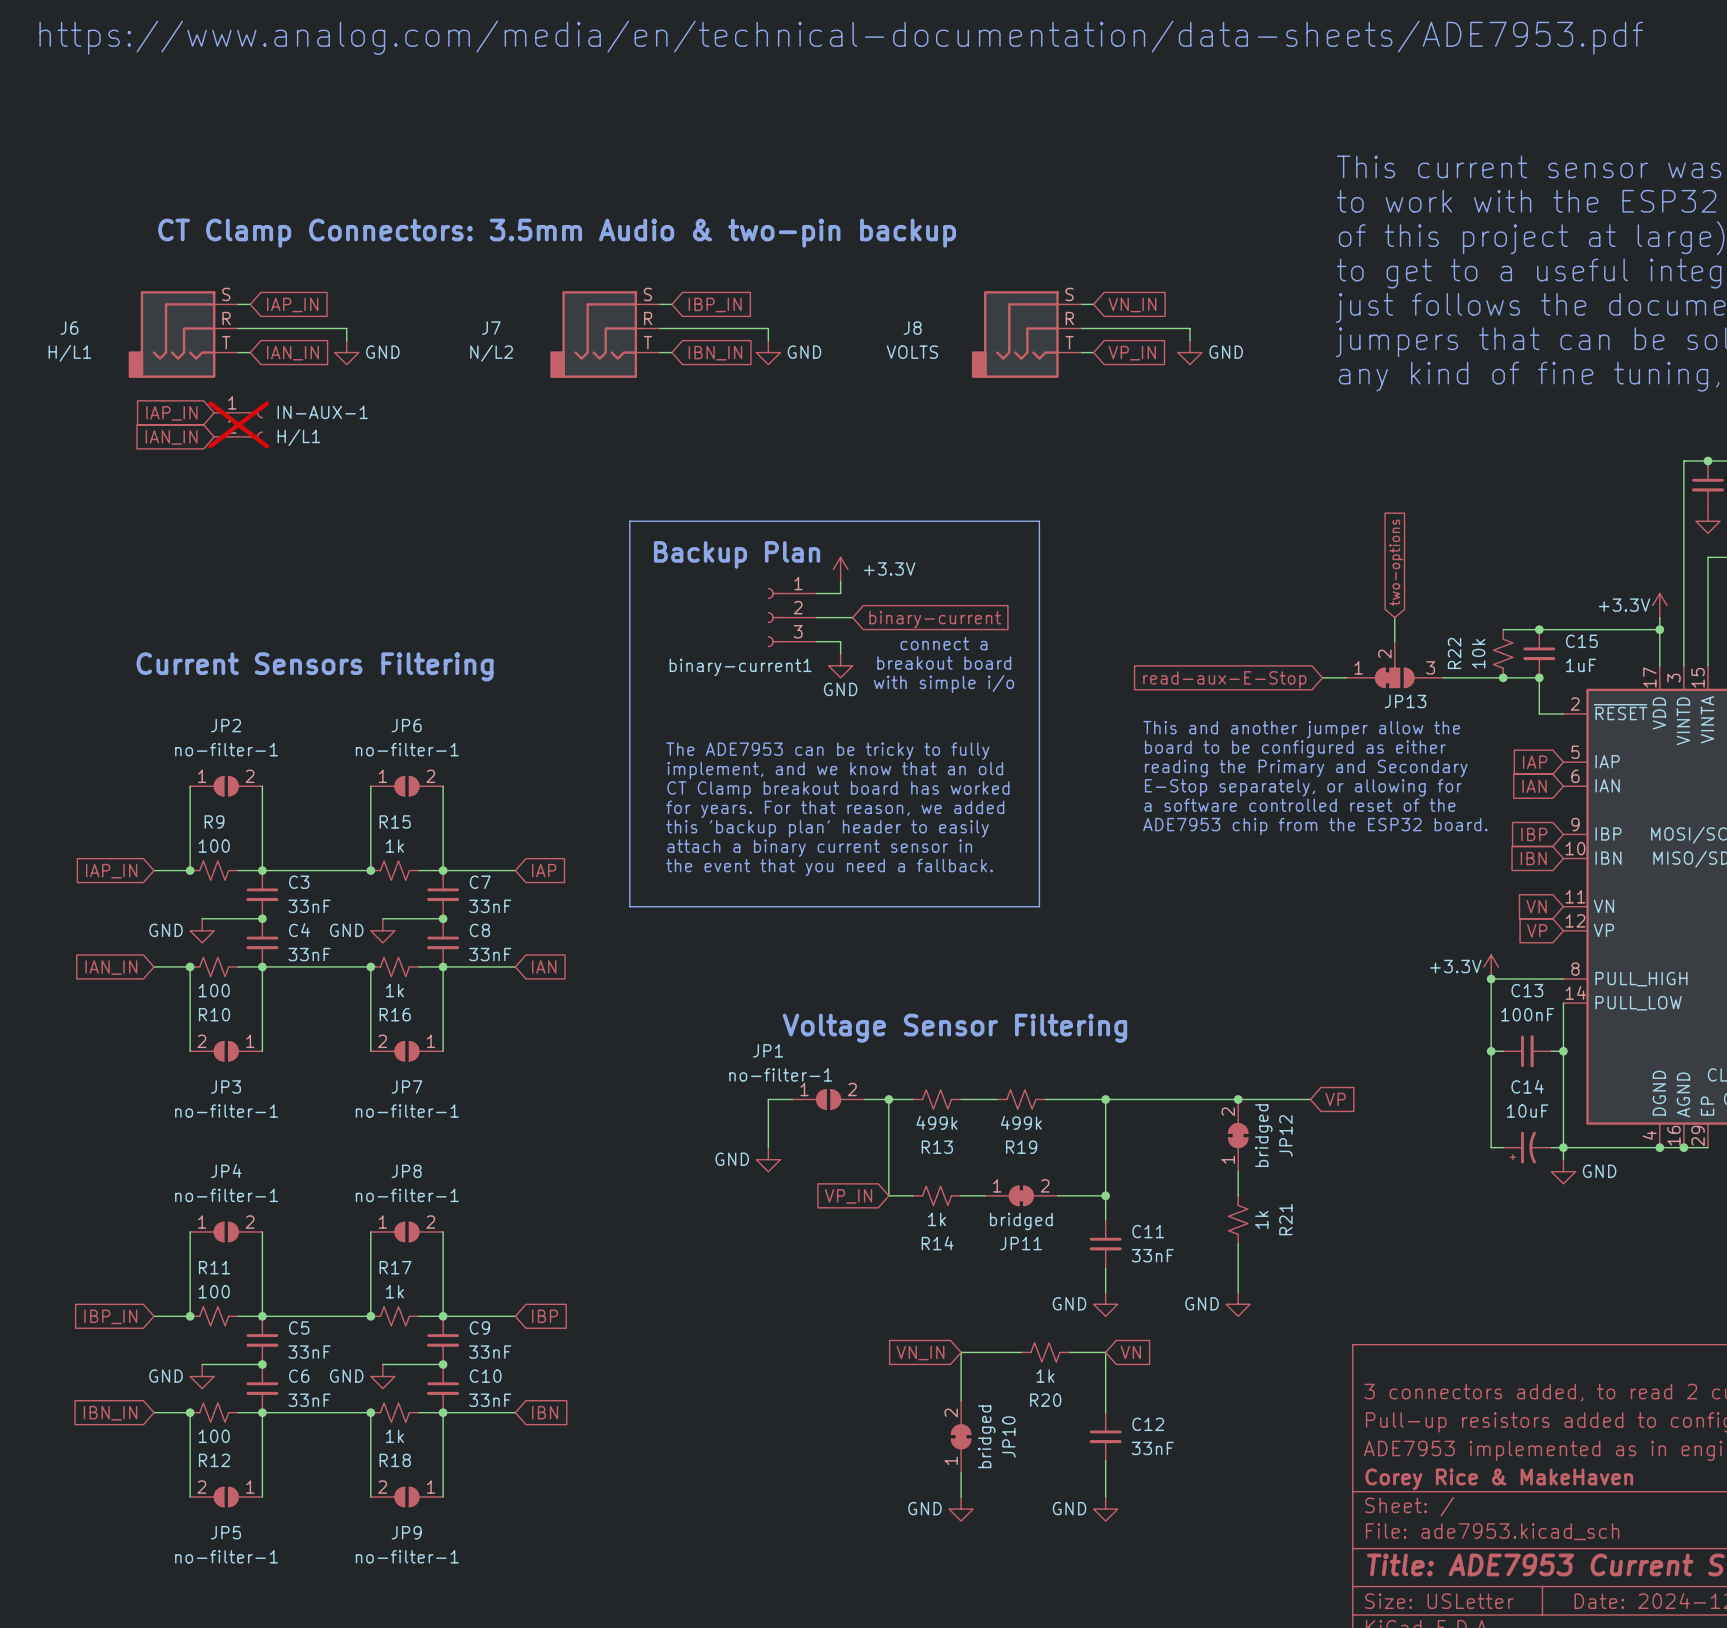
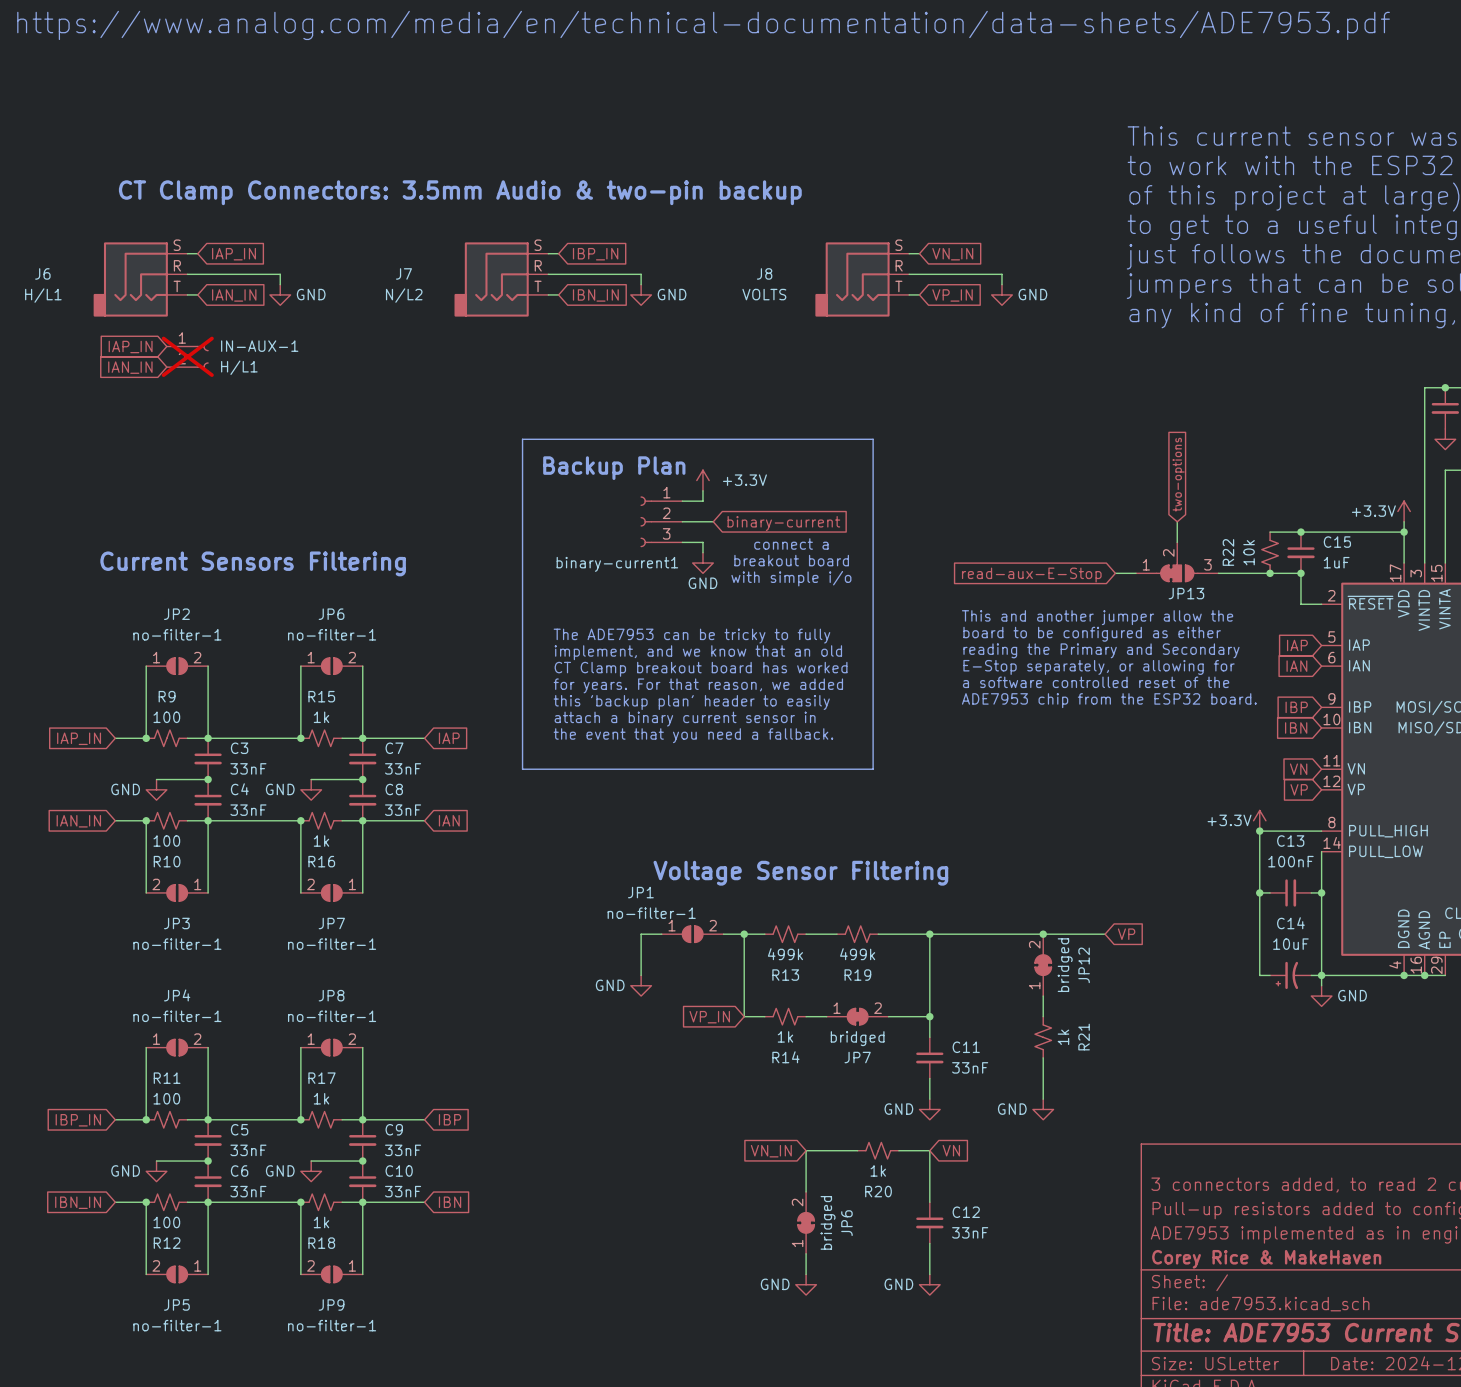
JP11 name: JP11 (1021, 1243) -> JP7 (857, 1057)
JP10 name: JP10 (1008, 1437) -> JP6 (846, 1223)

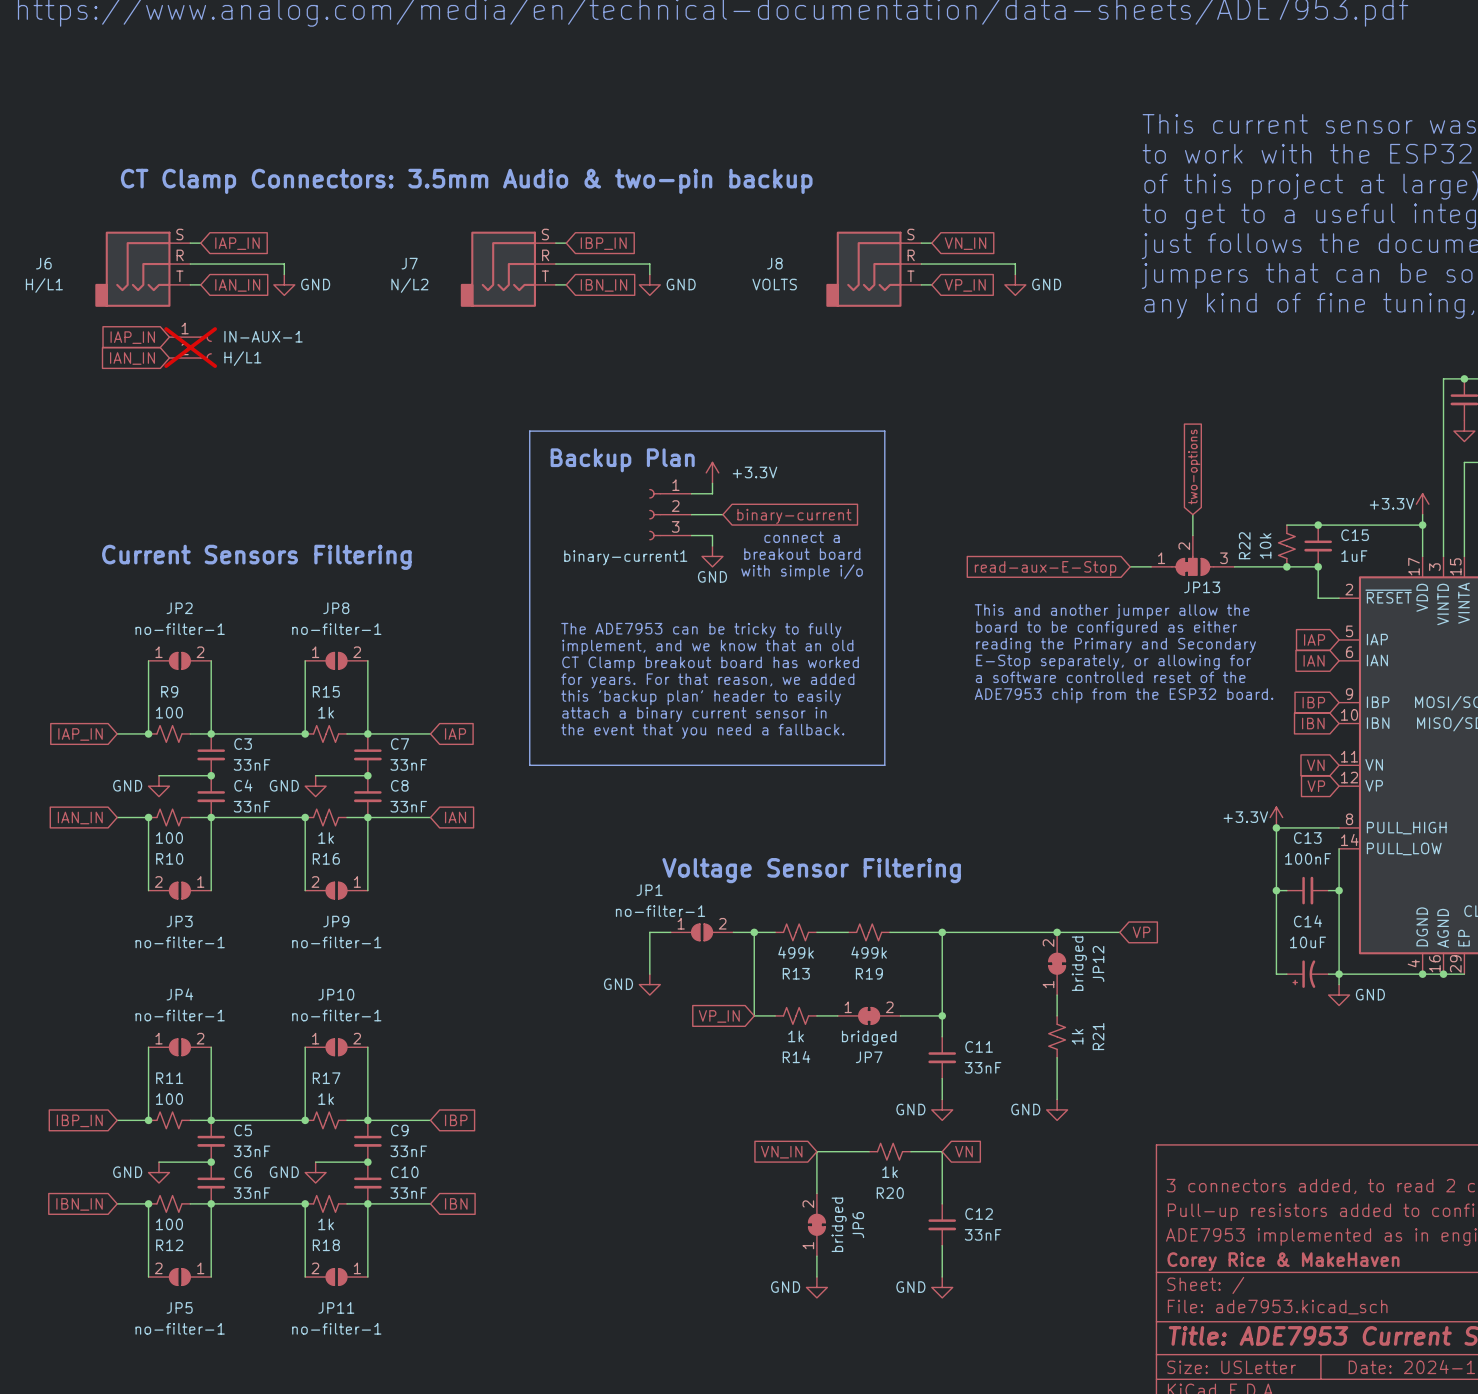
JP6 name: JP6 (331, 614) -> JP8 (336, 608)
JP7 name: JP7 (331, 923) -> JP9 (336, 921)
JP8 name: JP8 (331, 995) -> JP10 (336, 994)
JP9 name: JP9 (331, 1304) -> JP11 (336, 1307)

